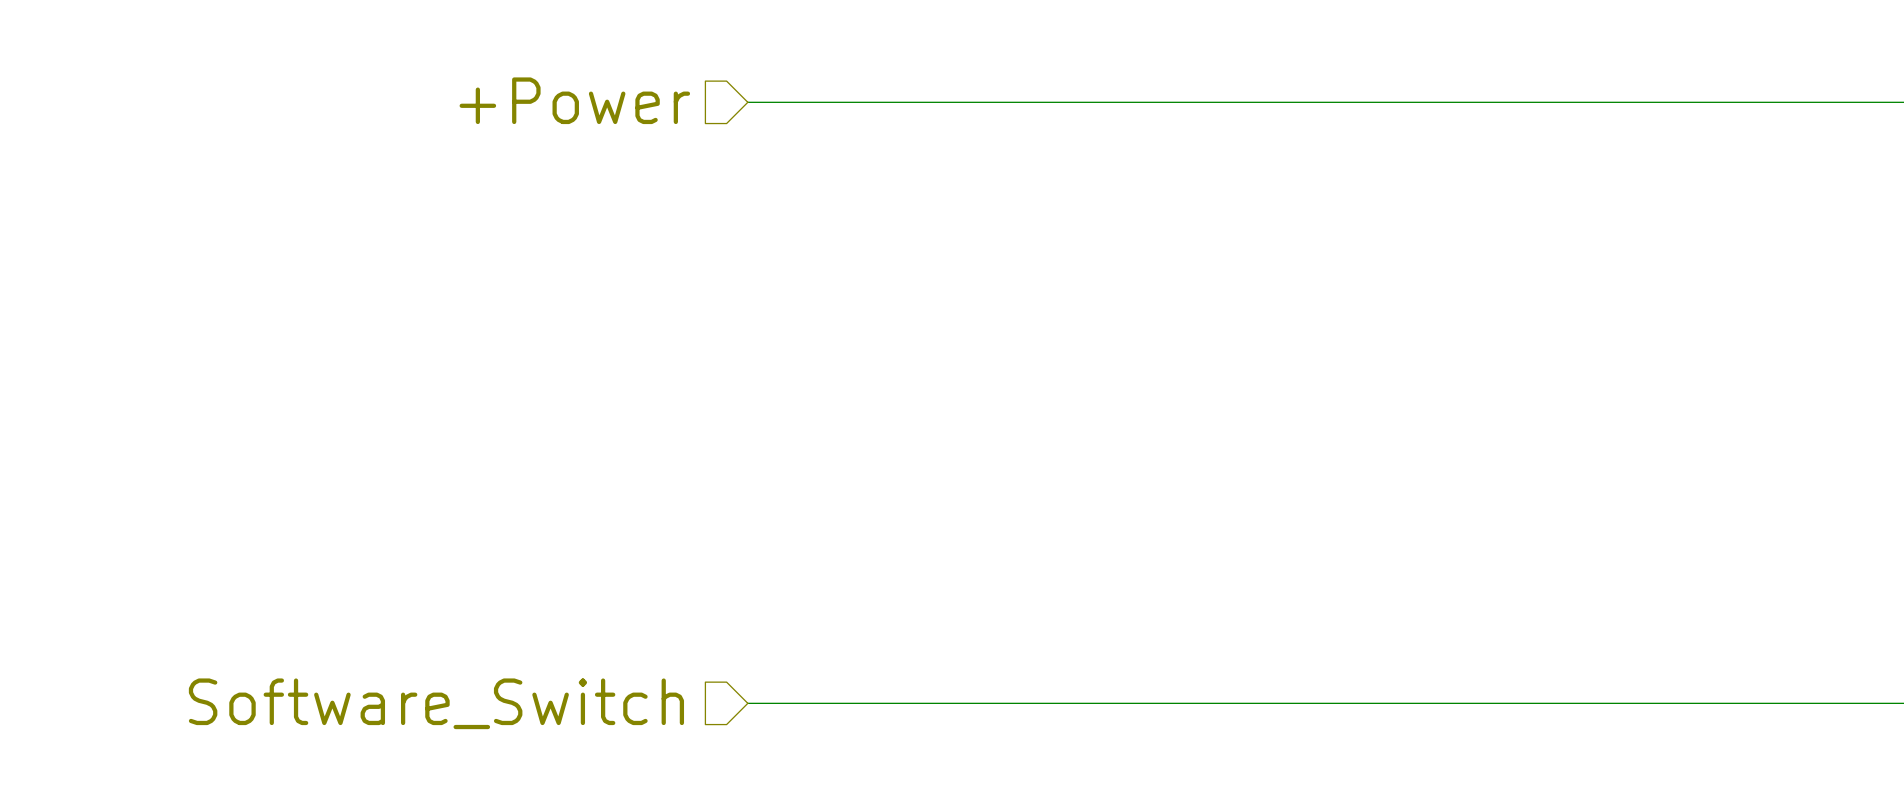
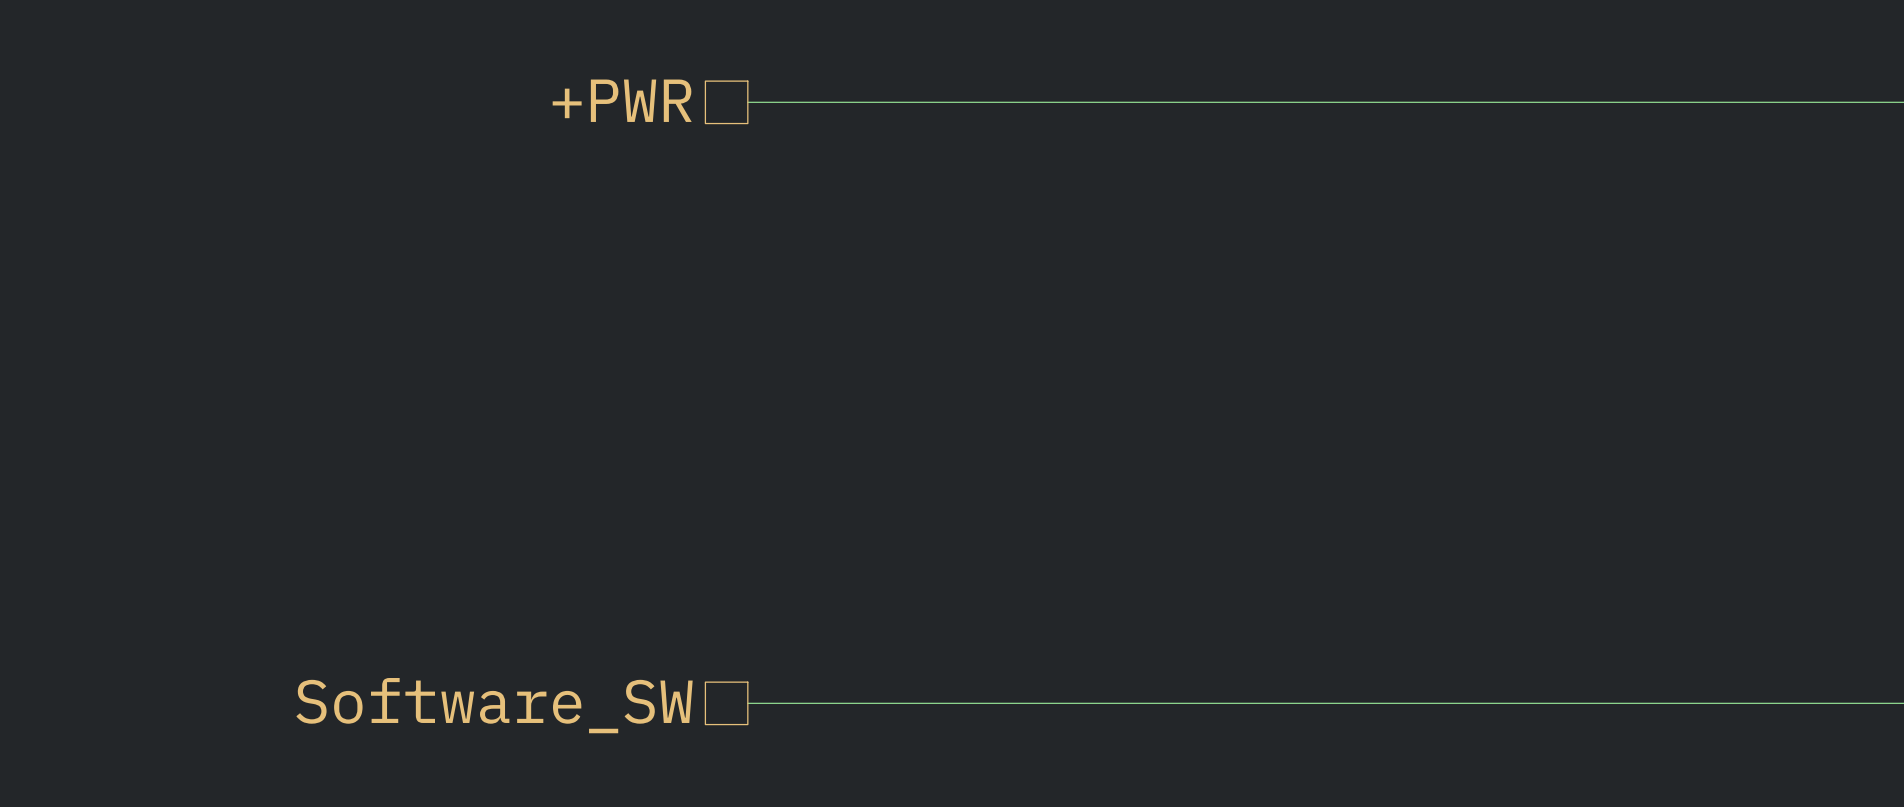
hierarchical label shape: input (574, 100) -> passive (622, 100)
hierarchical label: +Power (574, 100) -> +PWR (622, 100)
hierarchical label shape: input (436, 703) -> passive (494, 705)
hierarchical label: Software_Switch (436, 703) -> Software_SW (494, 705)

